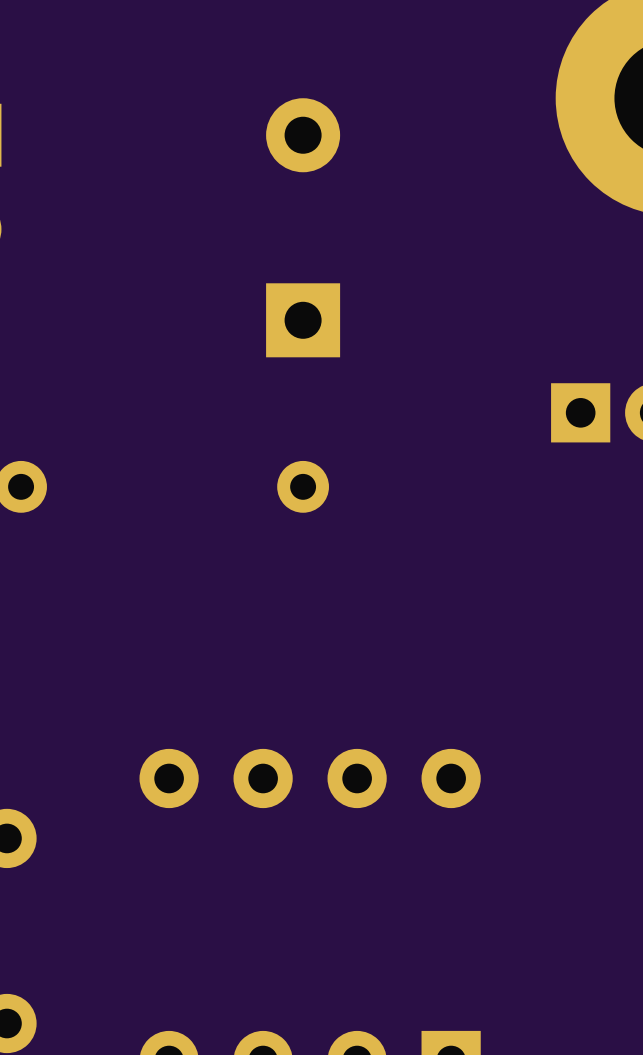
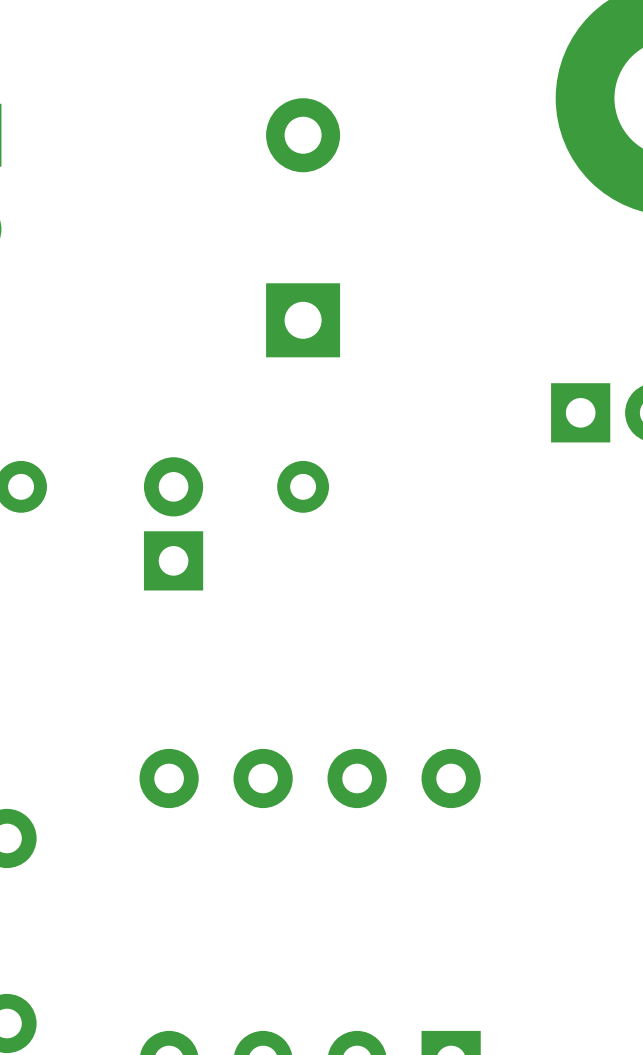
part: none -> (173, 523)

